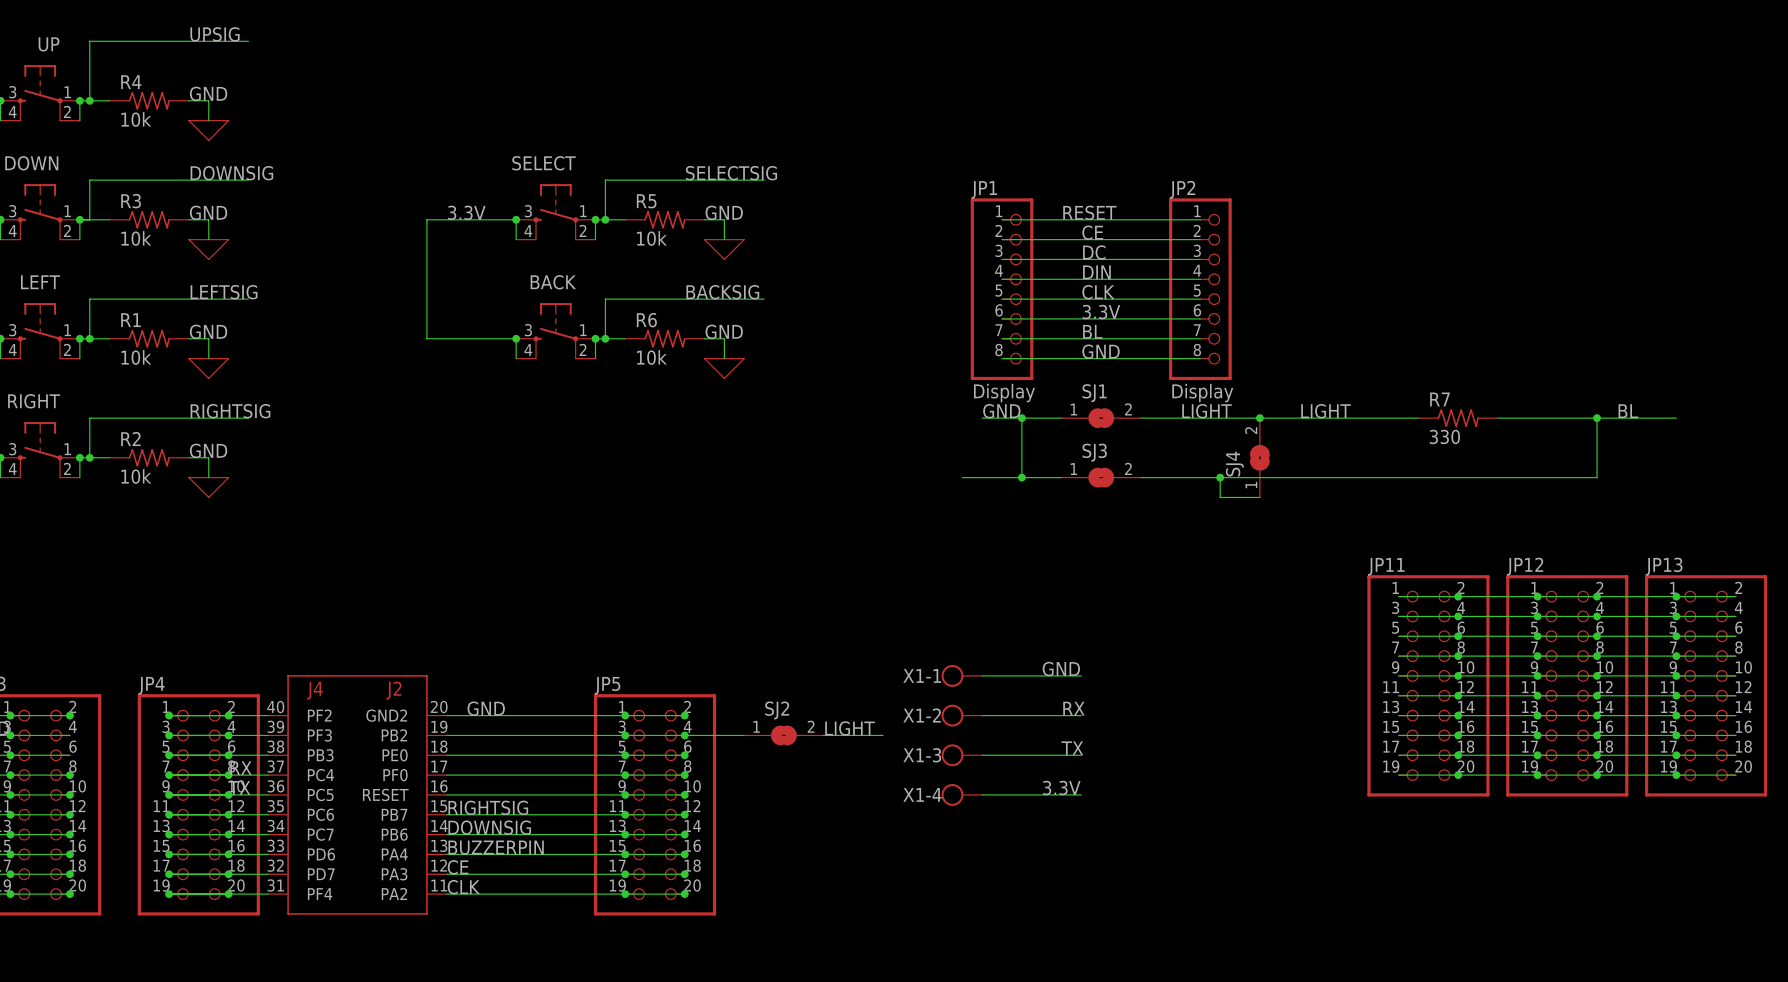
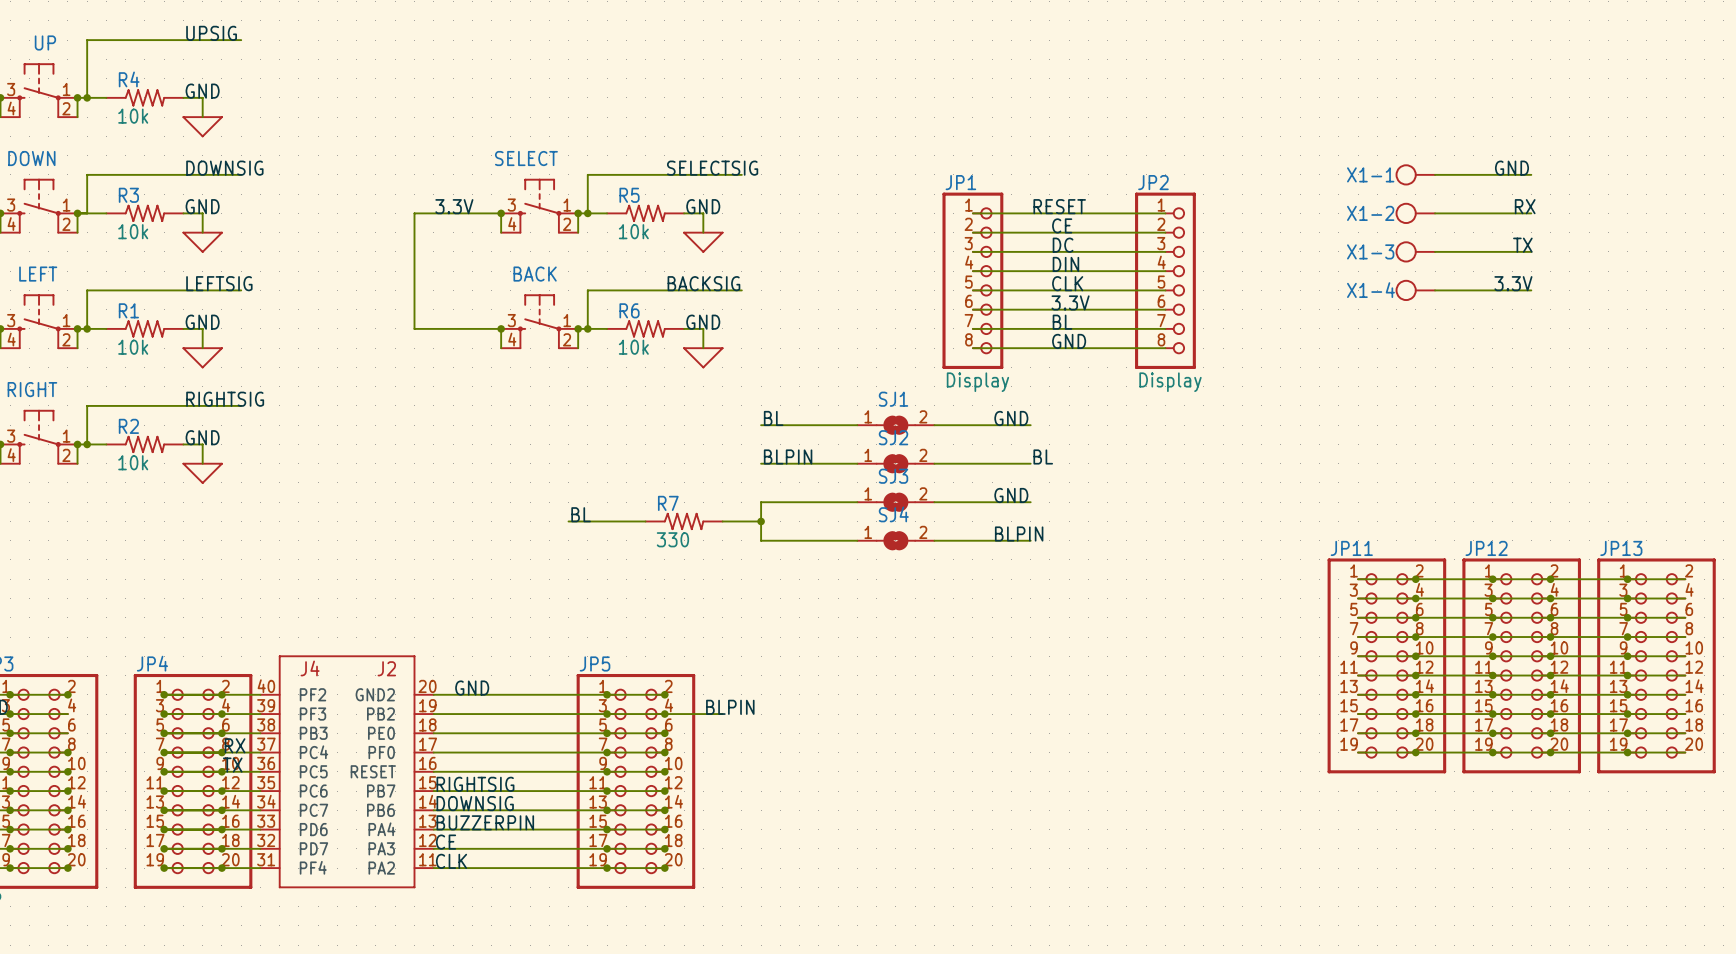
label: none -> GND (1511, 168)
wire: none -> (1435, 174) (1531, 174)
label: none -> RX (1525, 206)
wire: none -> (1435, 213) (1531, 213)
label: none -> TX (1522, 245)
wire: none -> (1435, 251) (1531, 251)
label: none -> 3.3V (1513, 283)
wire: none -> (1435, 290) (1531, 290)
label position: GND (1001, 411) -> GND (1011, 418)
label: LIGHT (1207, 411) -> none
label: LIGHT (1326, 411) -> none
label: BL (1628, 411) -> none
wire: (982, 418) (1061, 418) -> none
wire: (1021, 418) (1021, 477) -> none
junction: (1021, 418) -> none
SJ1 position: (1101, 418) -> (895, 425)
wire: (1140, 418) (1418, 418) -> none
junction: (1259, 418) -> none
R7 position: (1458, 418) -> (684, 521)
wire: (1497, 418) (1676, 418) -> none
wire: (1597, 418) (1597, 477) (1140, 477) -> none
junction: (1597, 418) -> none
label: none -> BL (773, 418)
wire: none -> (761, 425) (857, 425)
wire: none -> (934, 425) (1030, 425)
SJ4 rotation: 0° (1259, 457) -> 90° clockwise (895, 540)
SJ4 position: (1259, 457) -> (895, 540)
label: none -> BLPIN (788, 456)
label: none -> BL (1043, 456)
wire: none -> (761, 463) (857, 463)
junction: (1021, 477) -> none
SJ3 position: (1101, 477) -> (895, 502)
wire: (1220, 477) (1220, 497) (1259, 497) -> none
junction: (1220, 477) -> none
label: none -> GND (1011, 495)
wire: none -> (857, 502) (761, 502) (761, 540) (857, 540)
label: none -> BL (581, 514)
wire: none -> (568, 521) (645, 521)
wire: none -> (722, 521) (761, 521)
junction: none -> (761, 521)
label: none -> BLPIN (1019, 534)
label: GND (1061, 669) -> none
X1-1 position: (961, 675) -> (1415, 174)
wire: (982, 675) (1081, 675) -> (934, 502) (1030, 502)
label: RX (1073, 708) -> none
X1-2 position: (961, 715) -> (1415, 213)
wire: (982, 715) (1081, 715) -> (934, 540) (1030, 540)
label: none -> BLPIN (730, 707)
label: LIGHT (850, 728) -> none
SJ2 position: (783, 735) -> (895, 463)
wire: (823, 735) (883, 735) -> none
label: TX (1072, 748) -> none
X1-3 position: (961, 755) -> (1415, 251)
wire: (982, 755) (1081, 755) -> none
label: 3.3V (1061, 788) -> none
X1-4 position: (961, 794) -> (1415, 290)
wire: (982, 794) (1081, 794) -> none

